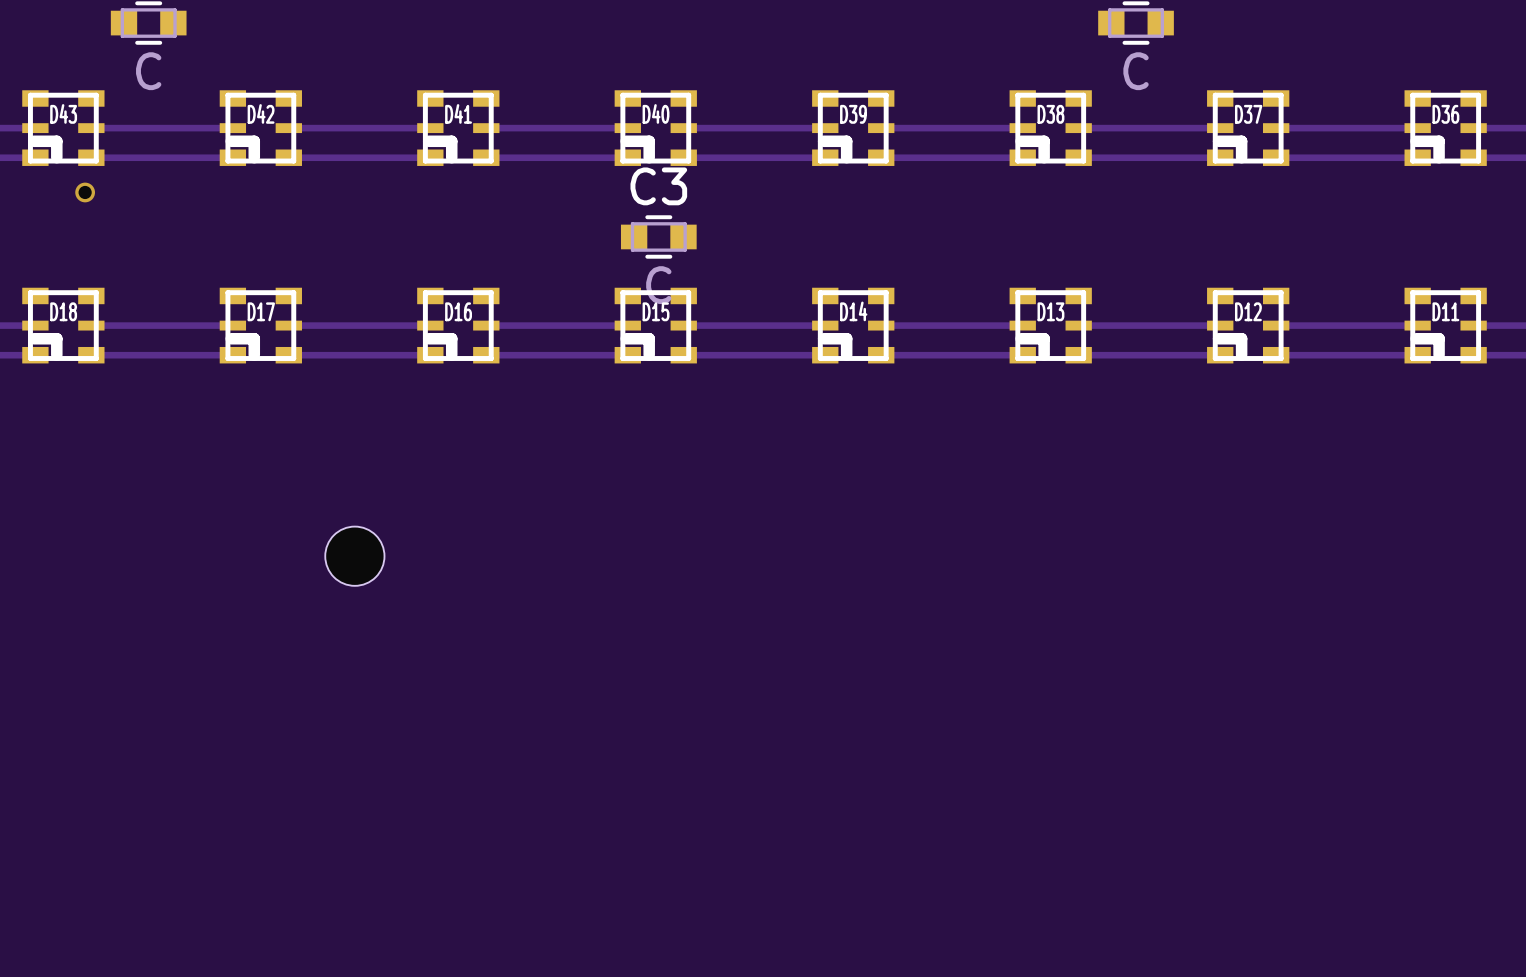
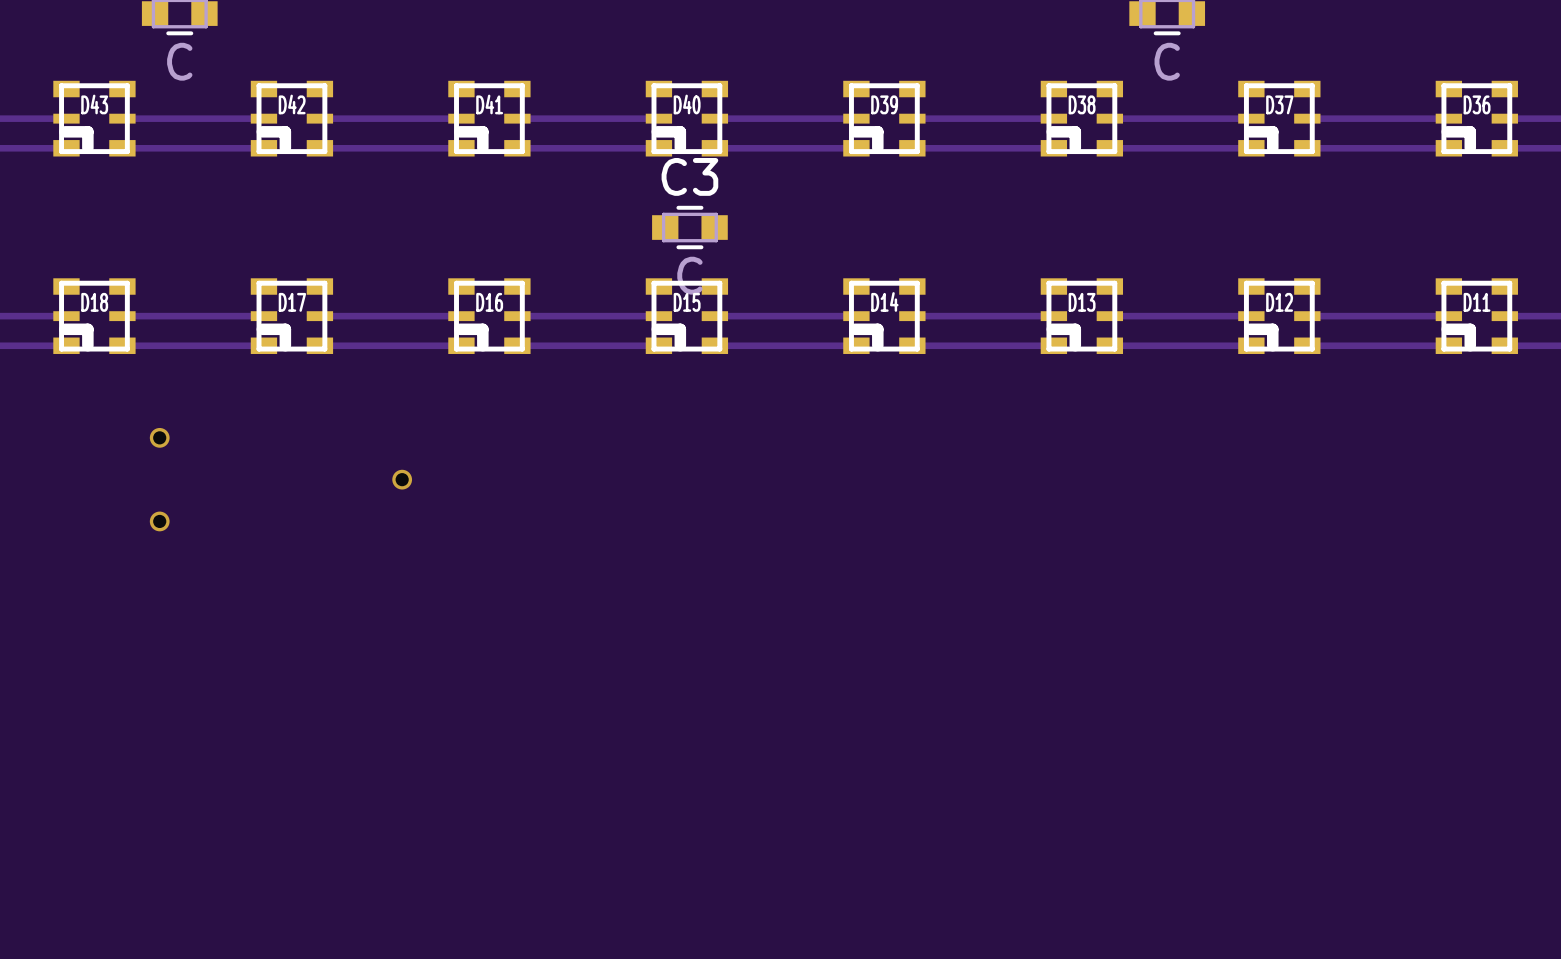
via: (85, 192) -> none
via: none -> (159, 437)
via: none -> (402, 479)
via: none -> (159, 521)
part: (354, 556) -> none

